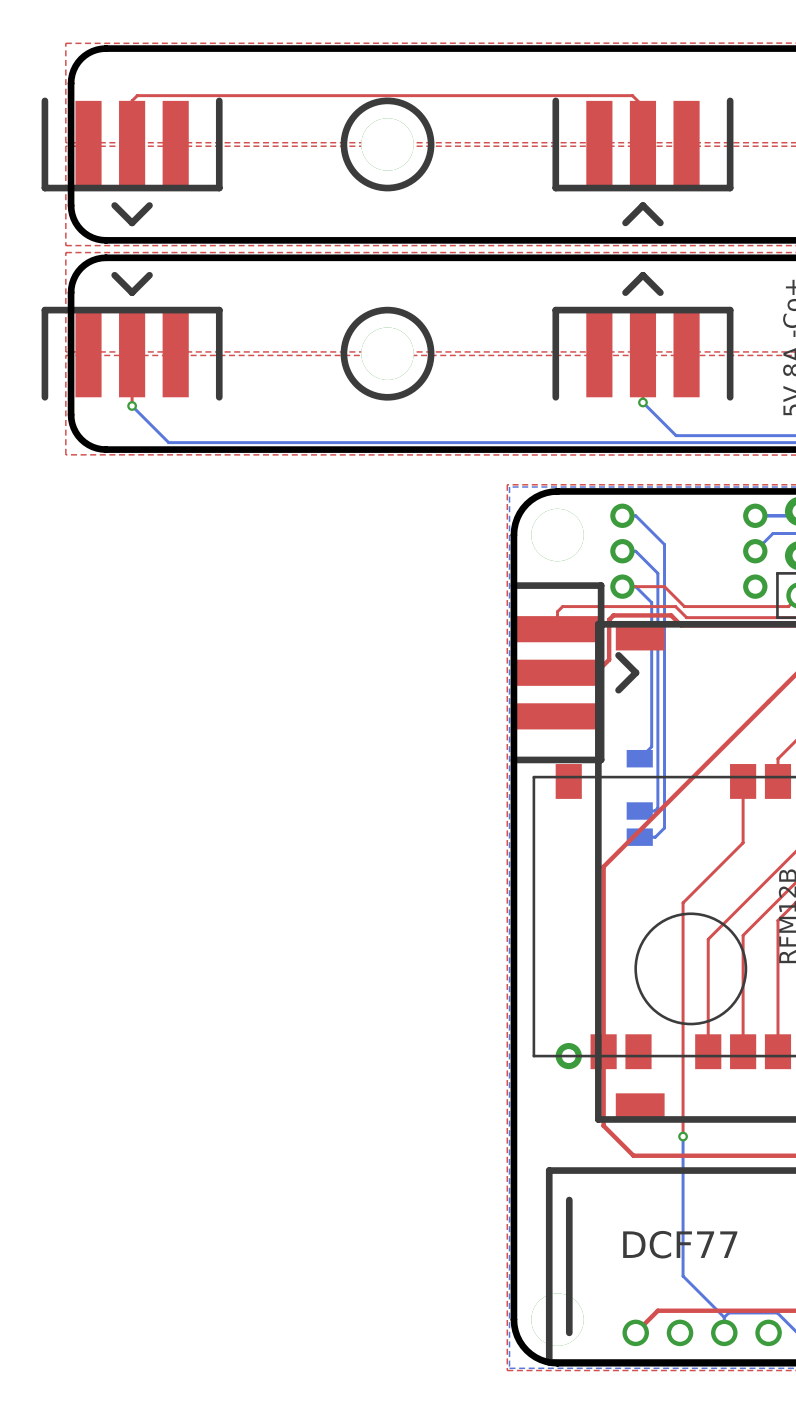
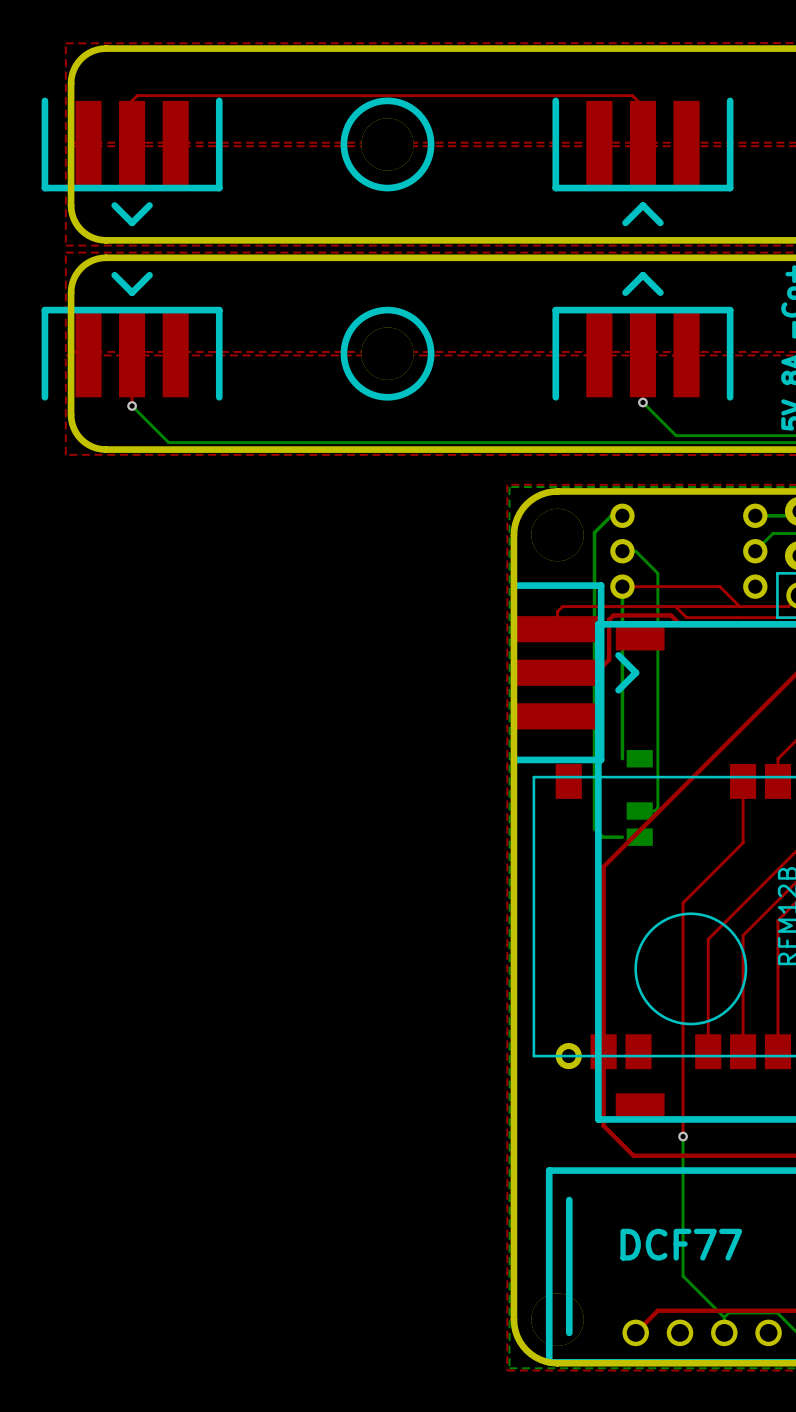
bottom track: (622, 515) (635, 515) (664, 544) (664, 828) (655, 837) (639, 837) -> (622, 515) (611, 515) (594, 532) (594, 828) (602, 837) (622, 837)
bottom track: (622, 586) (635, 586) (651, 602) (651, 746) (639, 758) -> (622, 586) (622, 758)
top track: (664, 586) (684, 606) -> (675, 606) (684, 606)
top track: none -> (664, 586) (719, 586) (739, 606)

